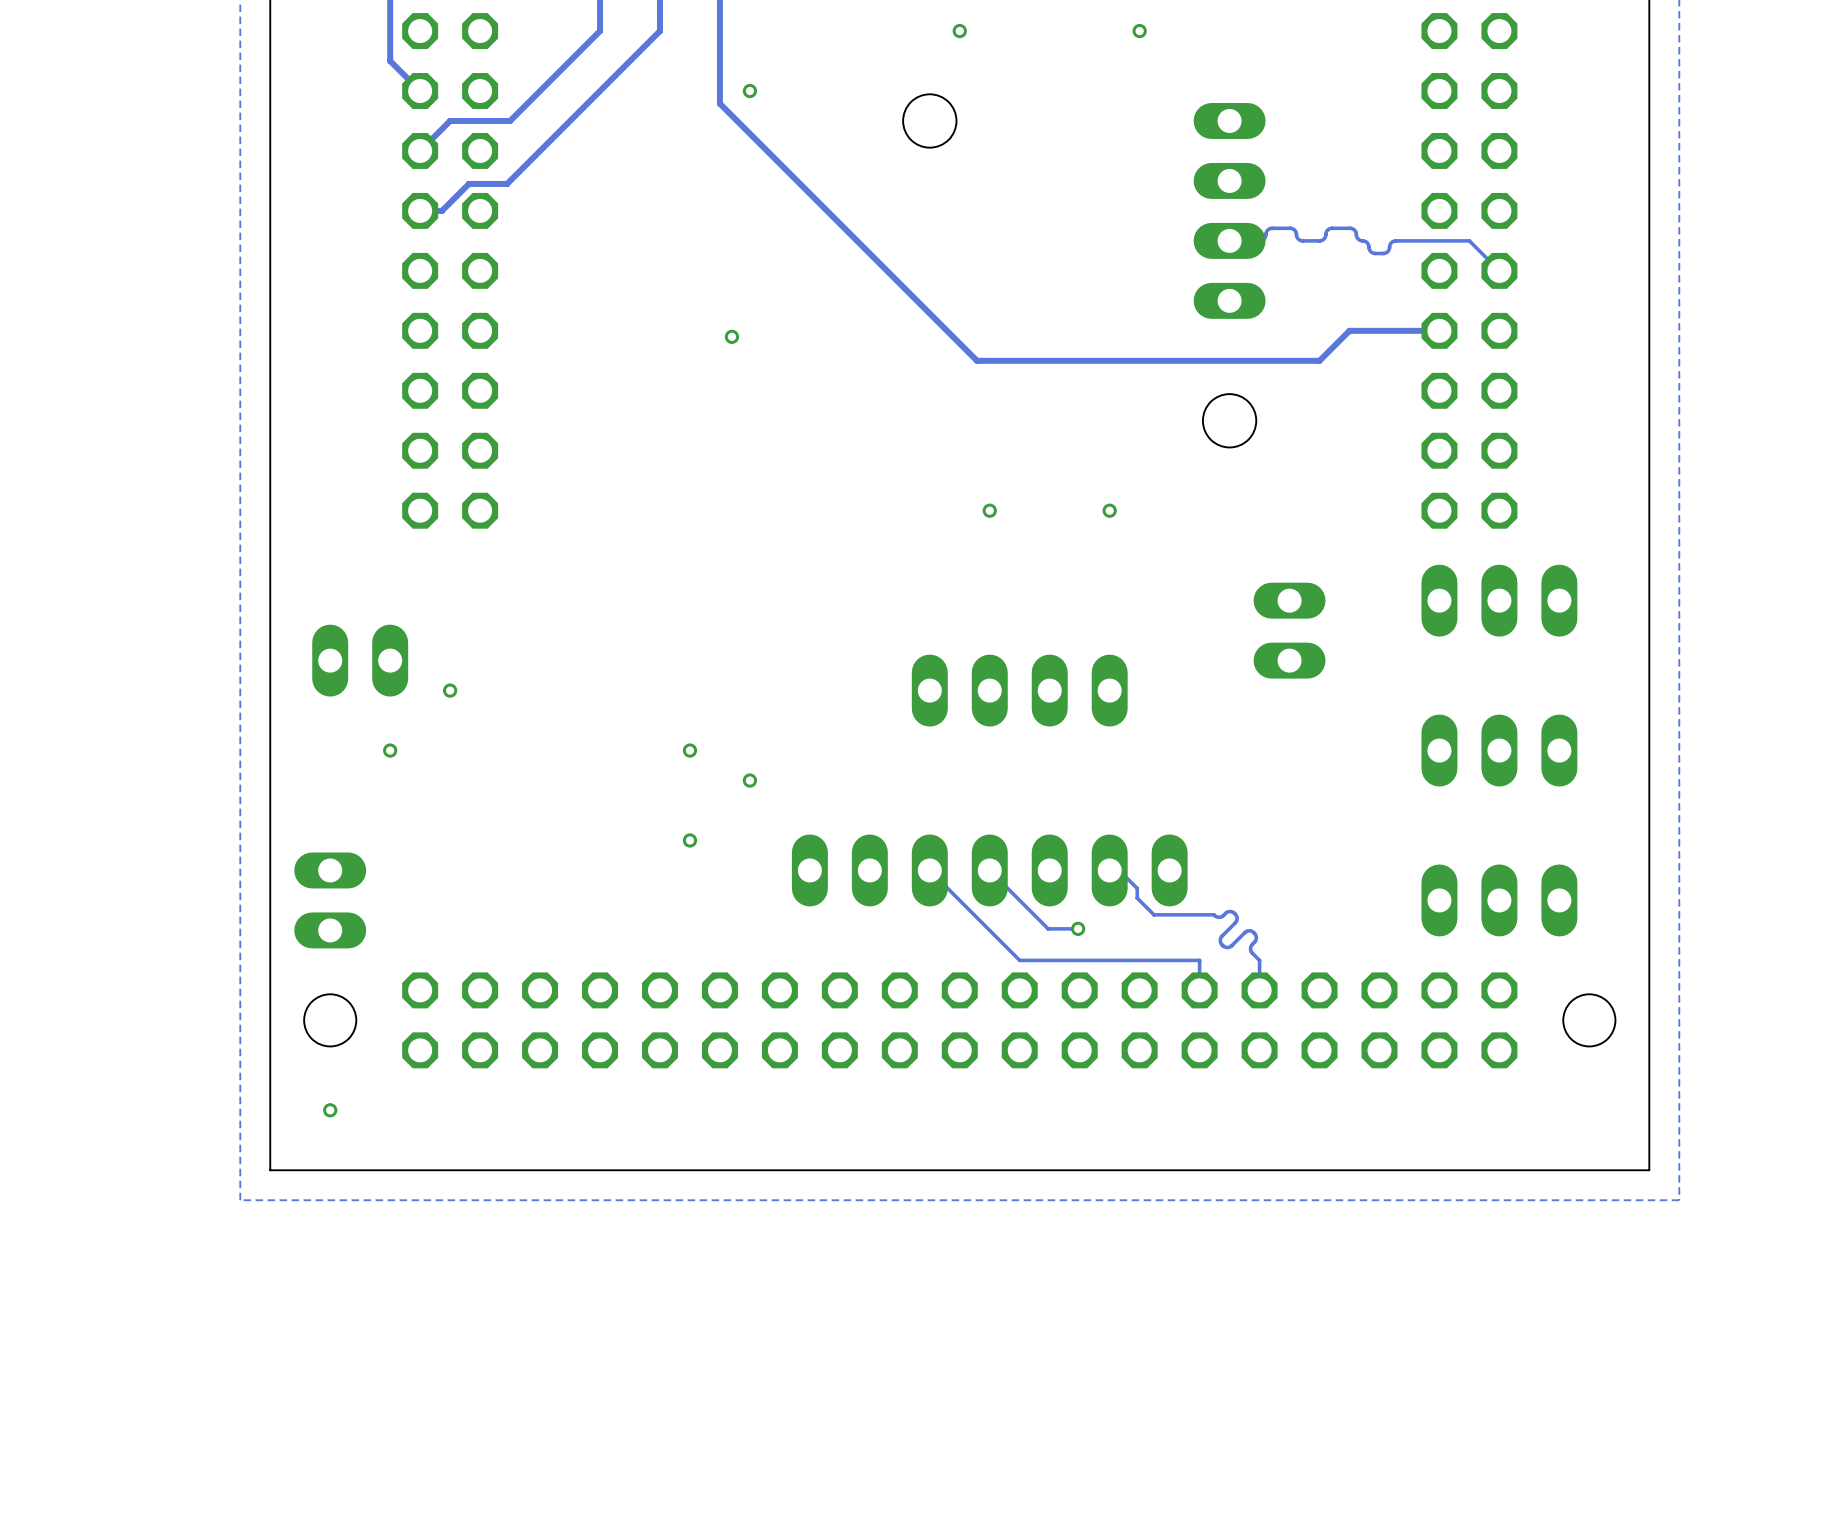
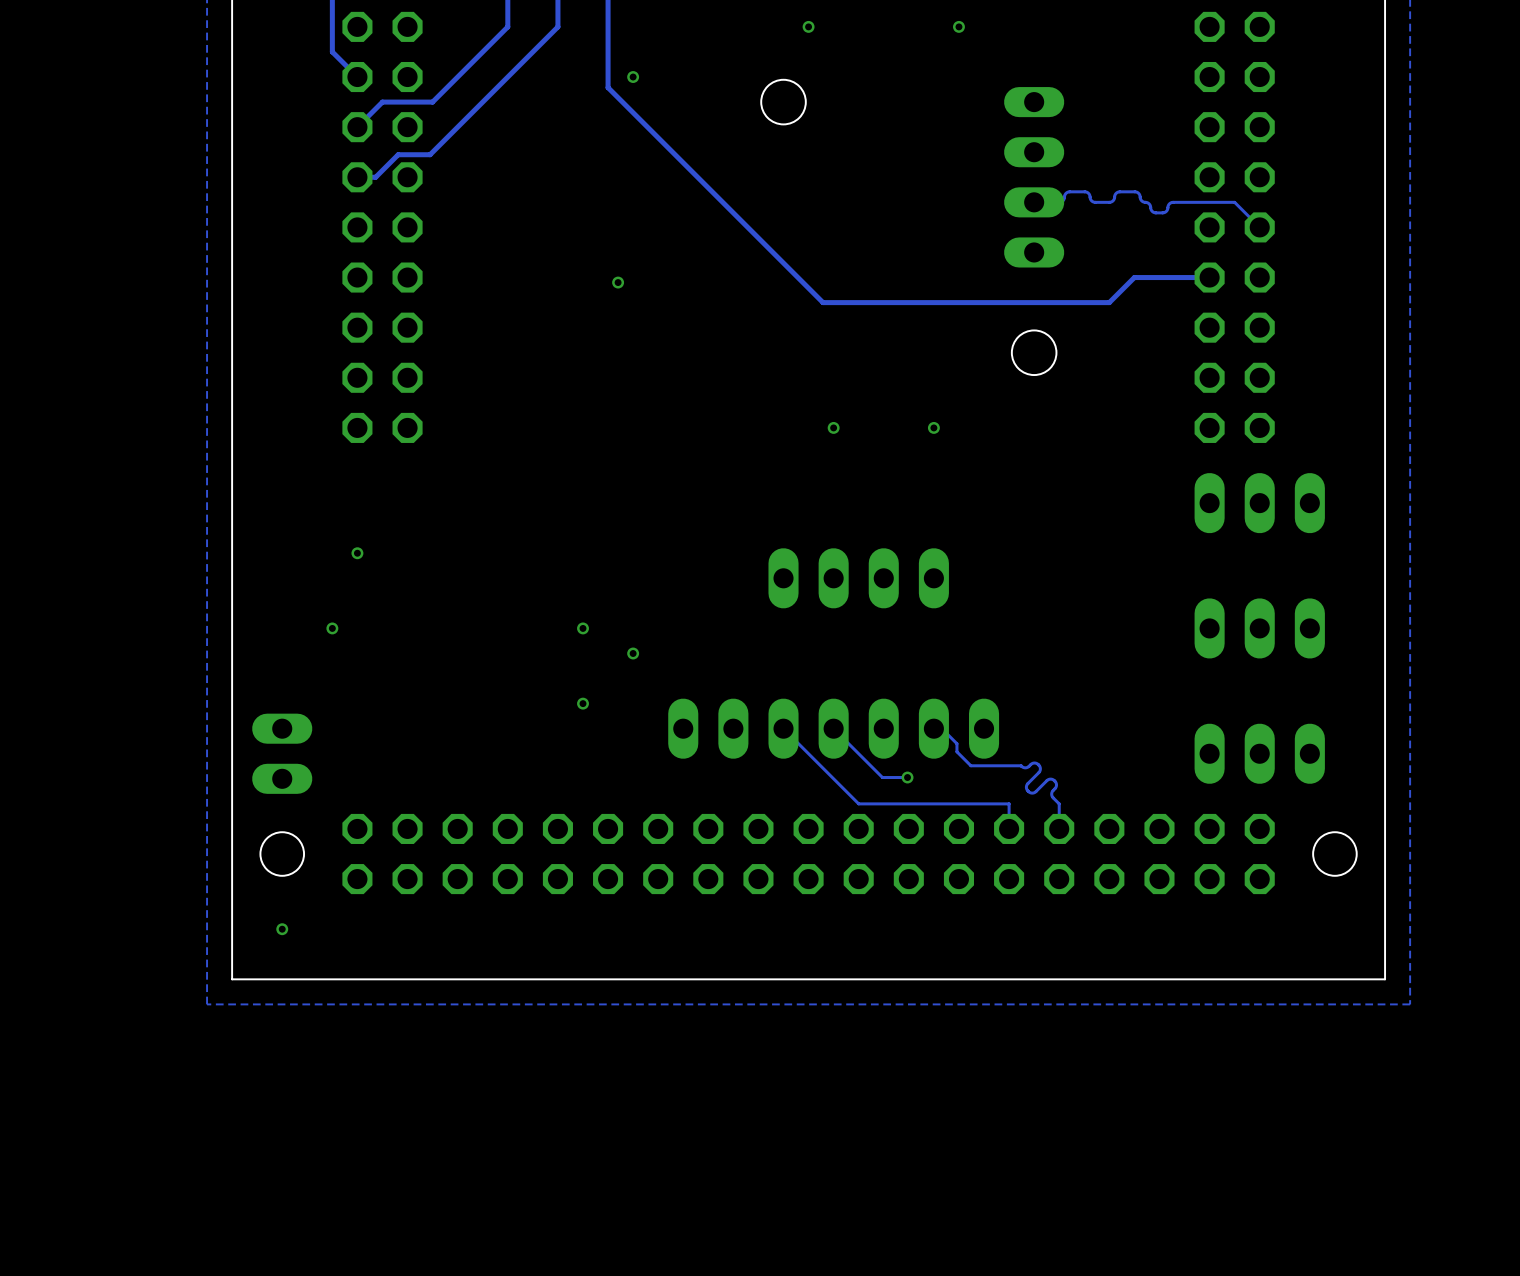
part: (1289, 630) -> none
part: (360, 660) -> none
via position: (450, 690) -> (357, 553)

